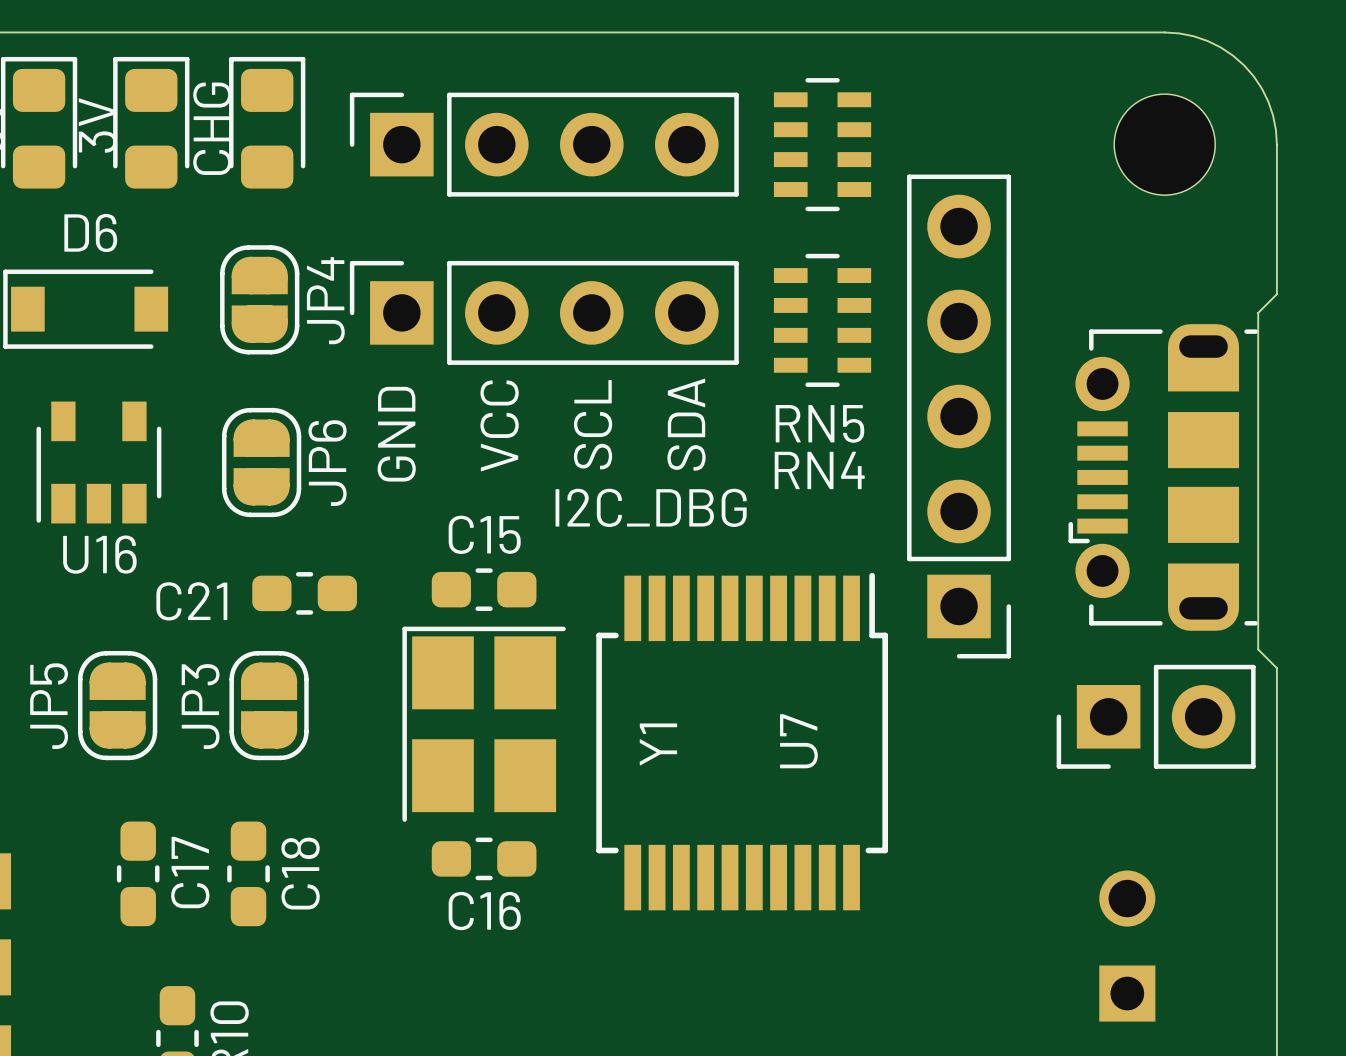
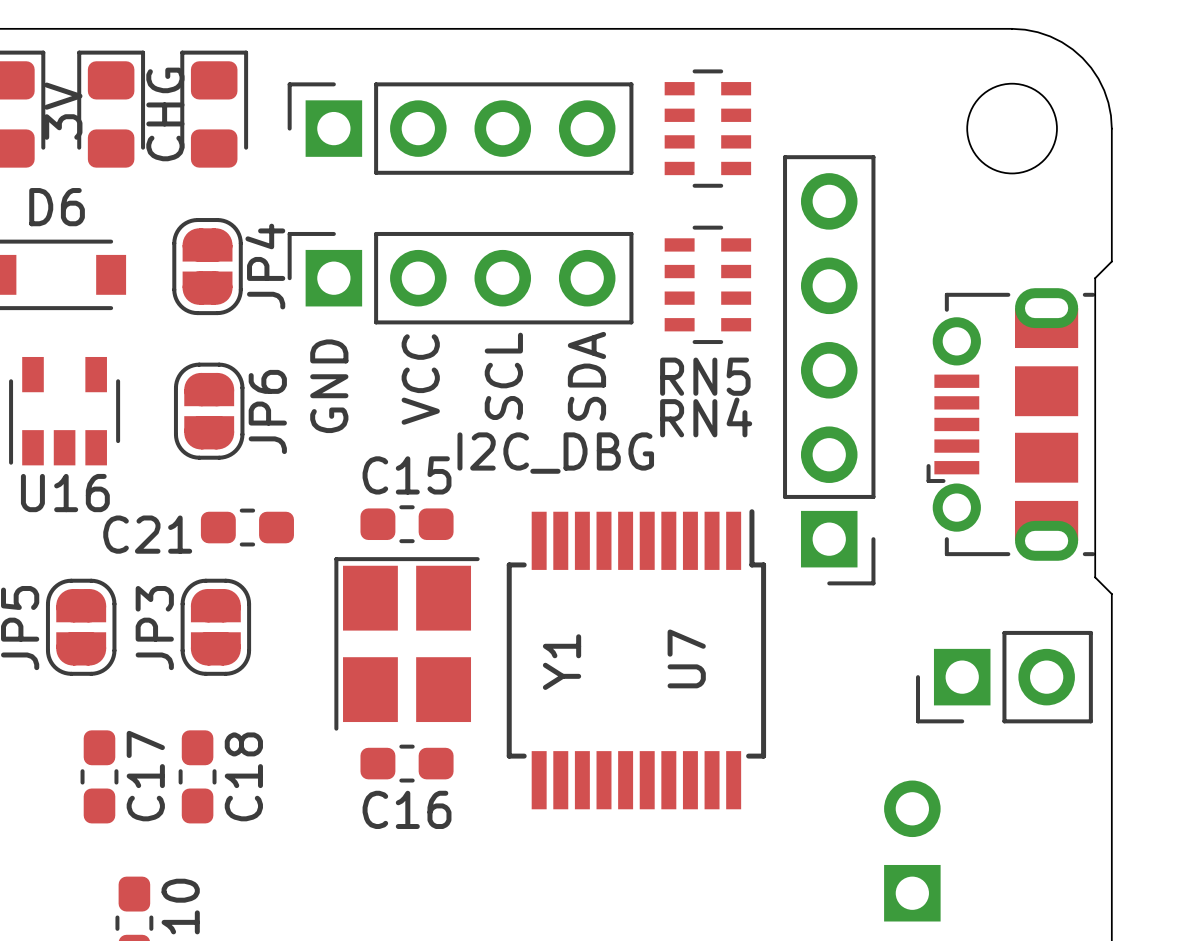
part position: (1156, 716) -> (1004, 677)
part: (1127, 946) -> none
part: none -> (912, 851)

